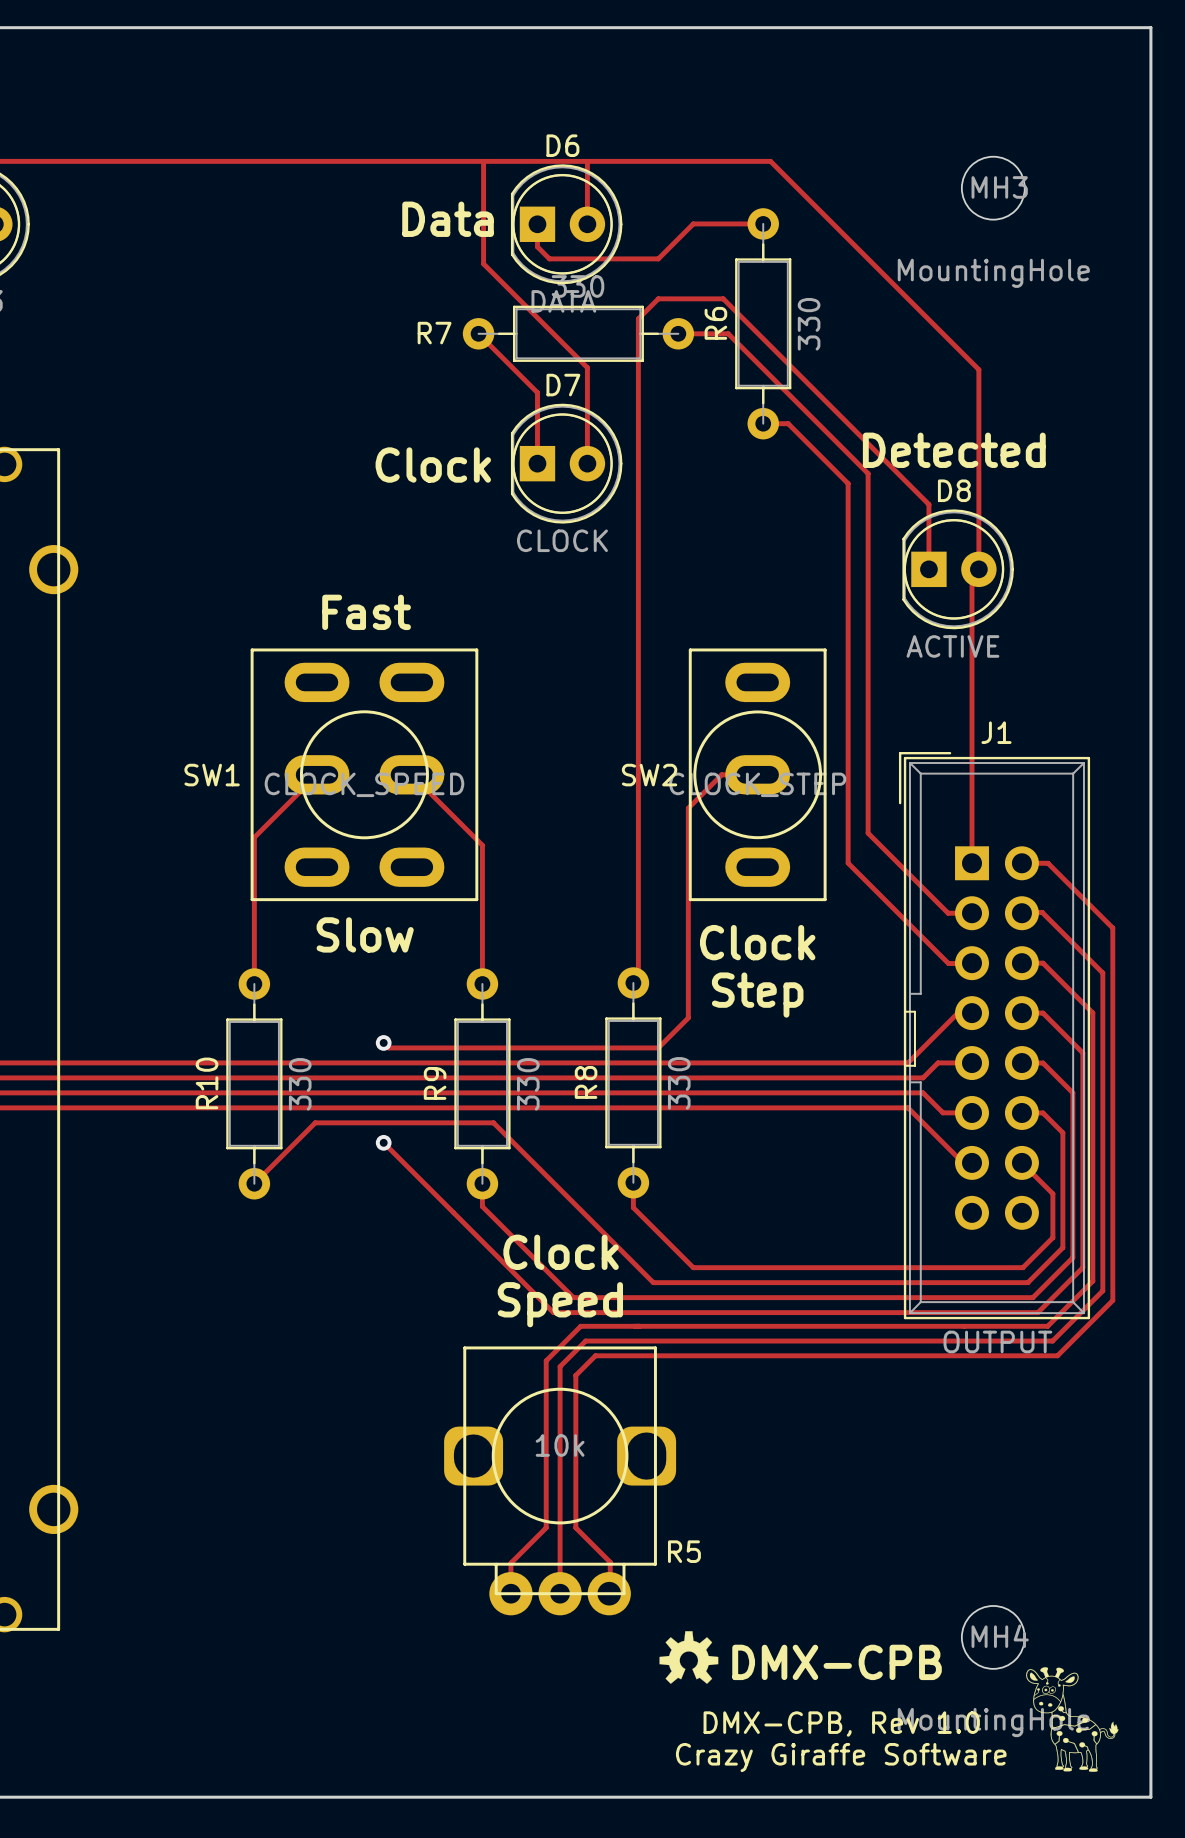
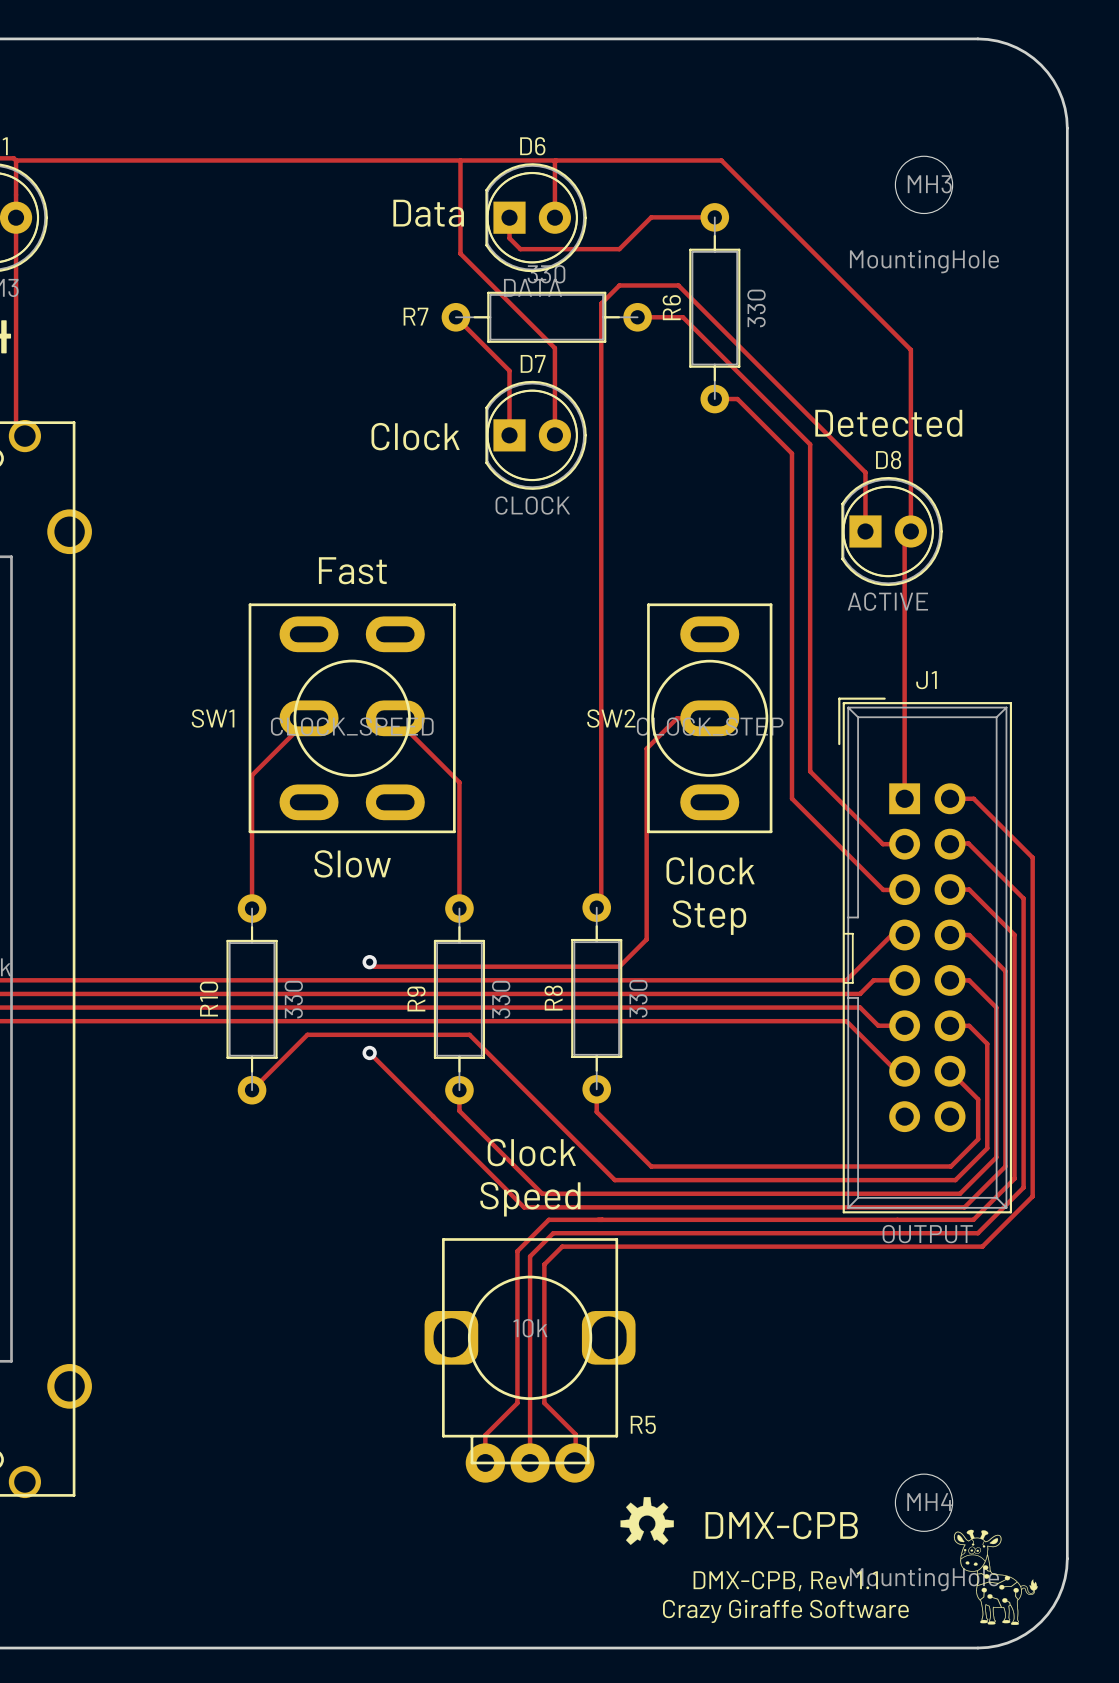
board edge: (1052, 27) (1150, 27) (1150, 125) -> (977, 38) (1007, 43) (1025, 52) (1041, 65) (1053, 80) (1062, 98) (1067, 128)
board edge: (1150, 1698) (1150, 1797) (1052, 1797) -> (1067, 1558) (1062, 1588) (1053, 1606) (1041, 1621) (1025, 1634) (1007, 1643) (977, 1648)
text: DMX-CPB, Rev 1.0 (841, 1724) -> DMX-CPB, Rev 1.1 (785, 1581)

